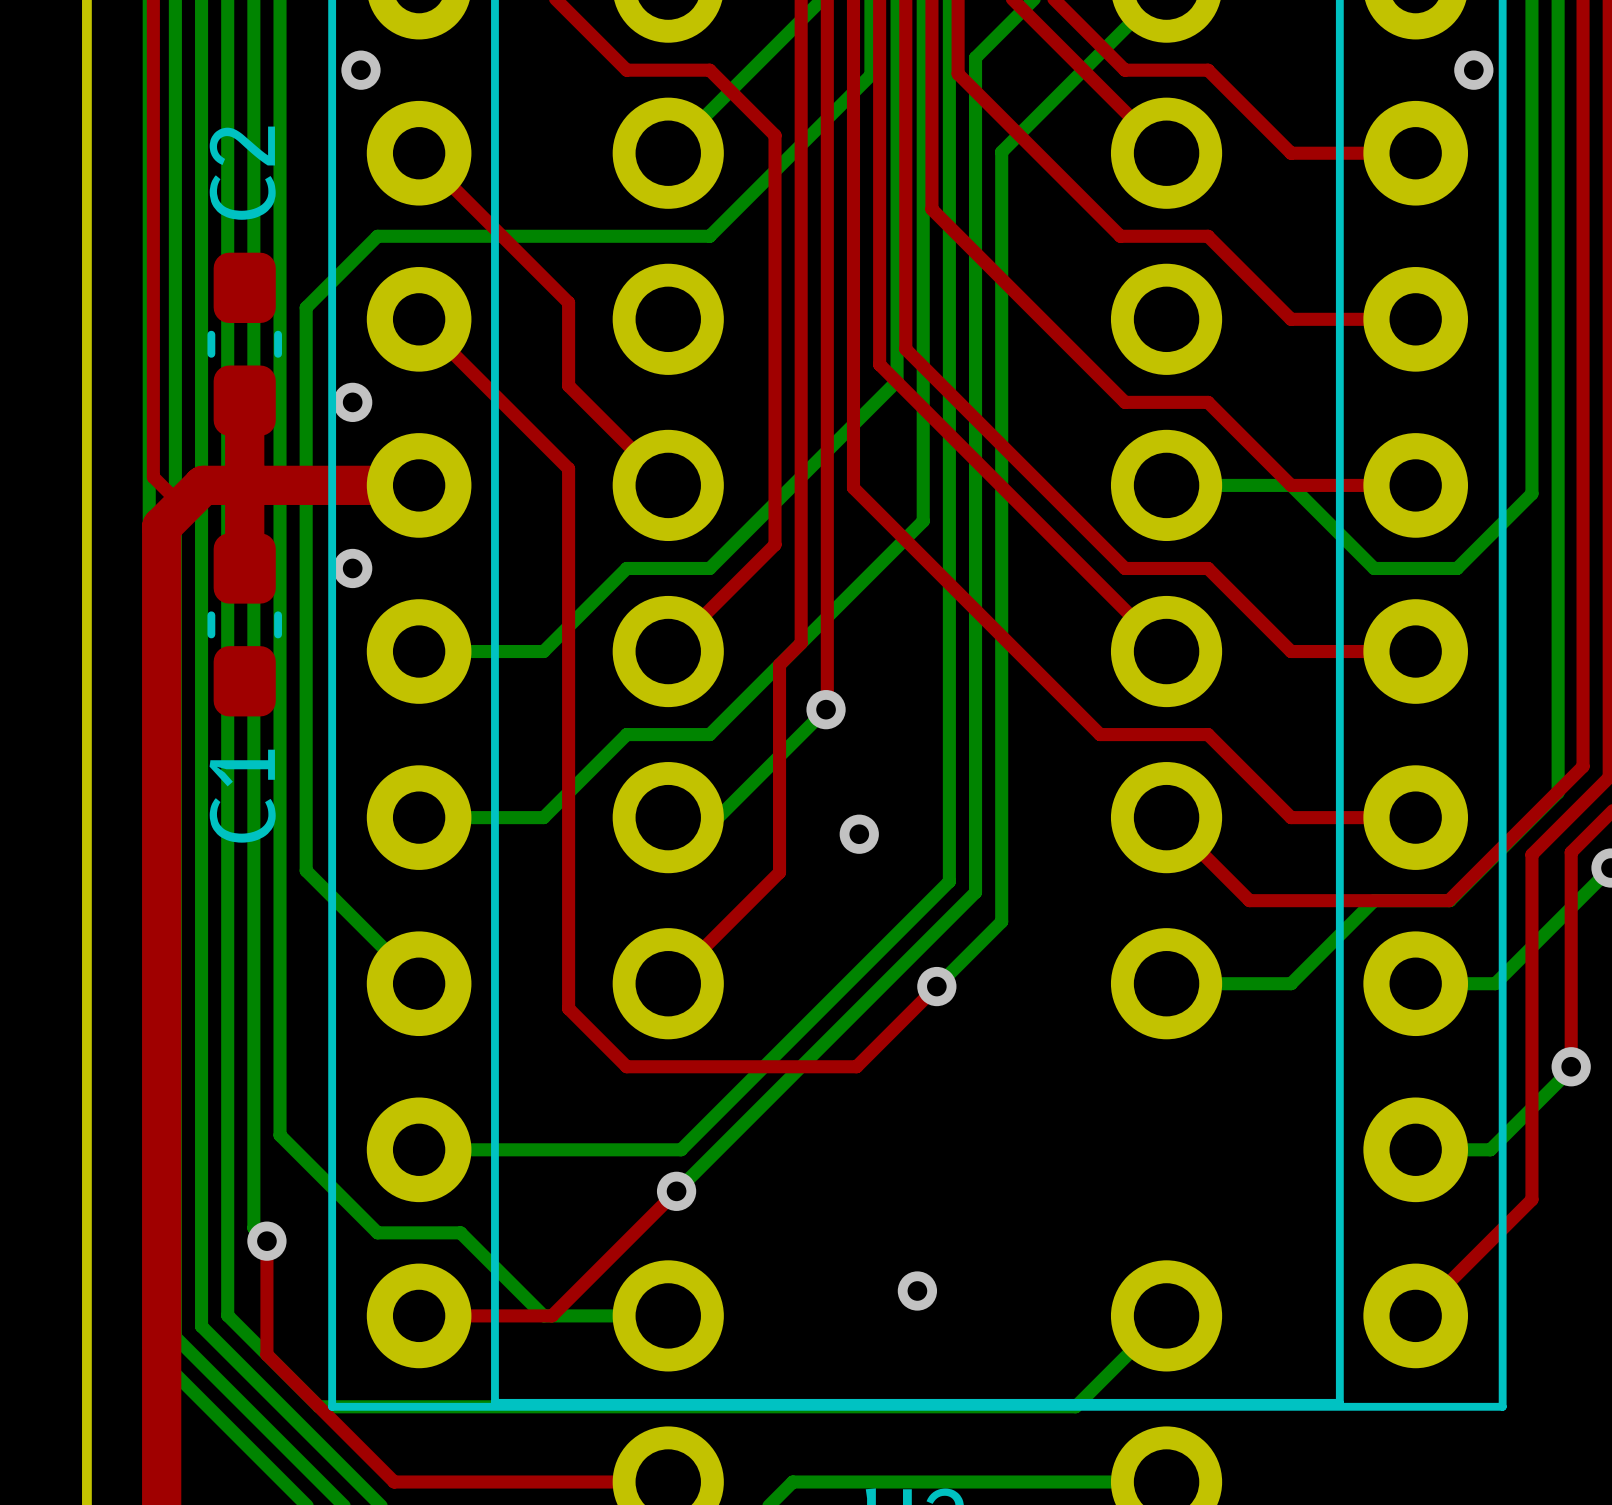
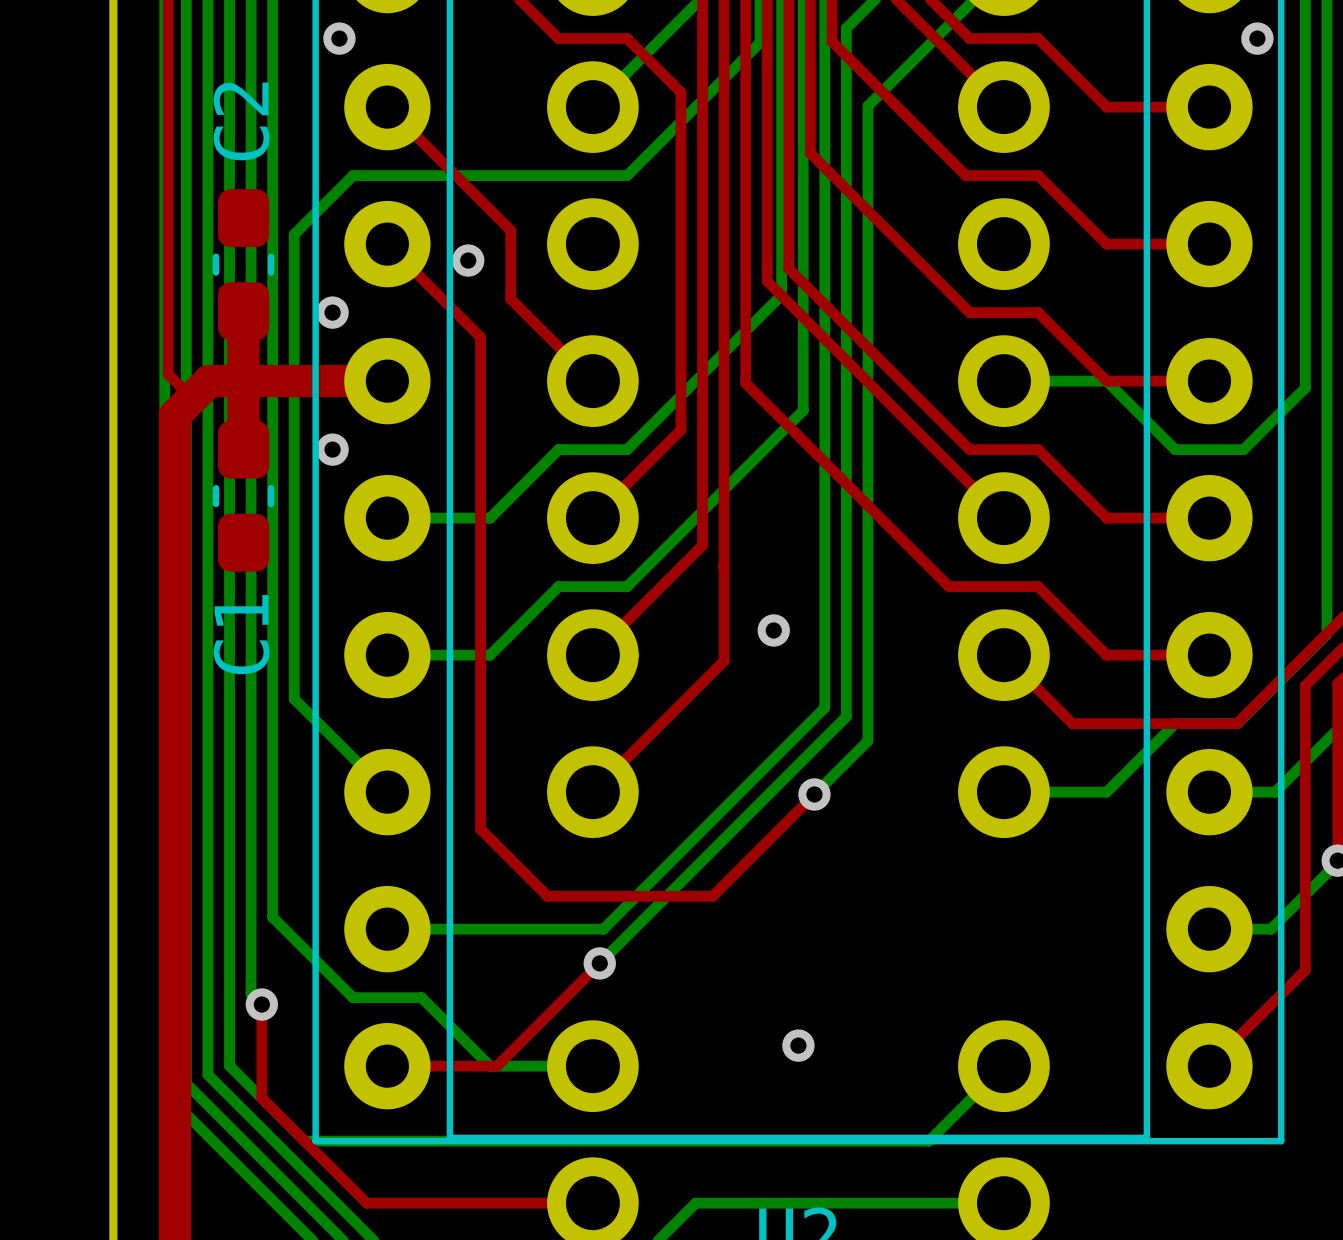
via: none -> (468, 260)
top track: (532, 432) (568, 468) (568, 1008) (626, 1066) (856, 1066) -> (480, 337) (480, 829) (547, 896) (712, 896) (748, 860)
top track: (801, 643) (779, 664) (779, 872) -> (724, 565) (724, 660) (684, 700)
top track: none -> (702, 511) (702, 545) (592, 655)
bottom track: (826, 709) (718, 817) -> none
via: (826, 709) -> none
via: none -> (773, 630)
via: (859, 834) -> none

